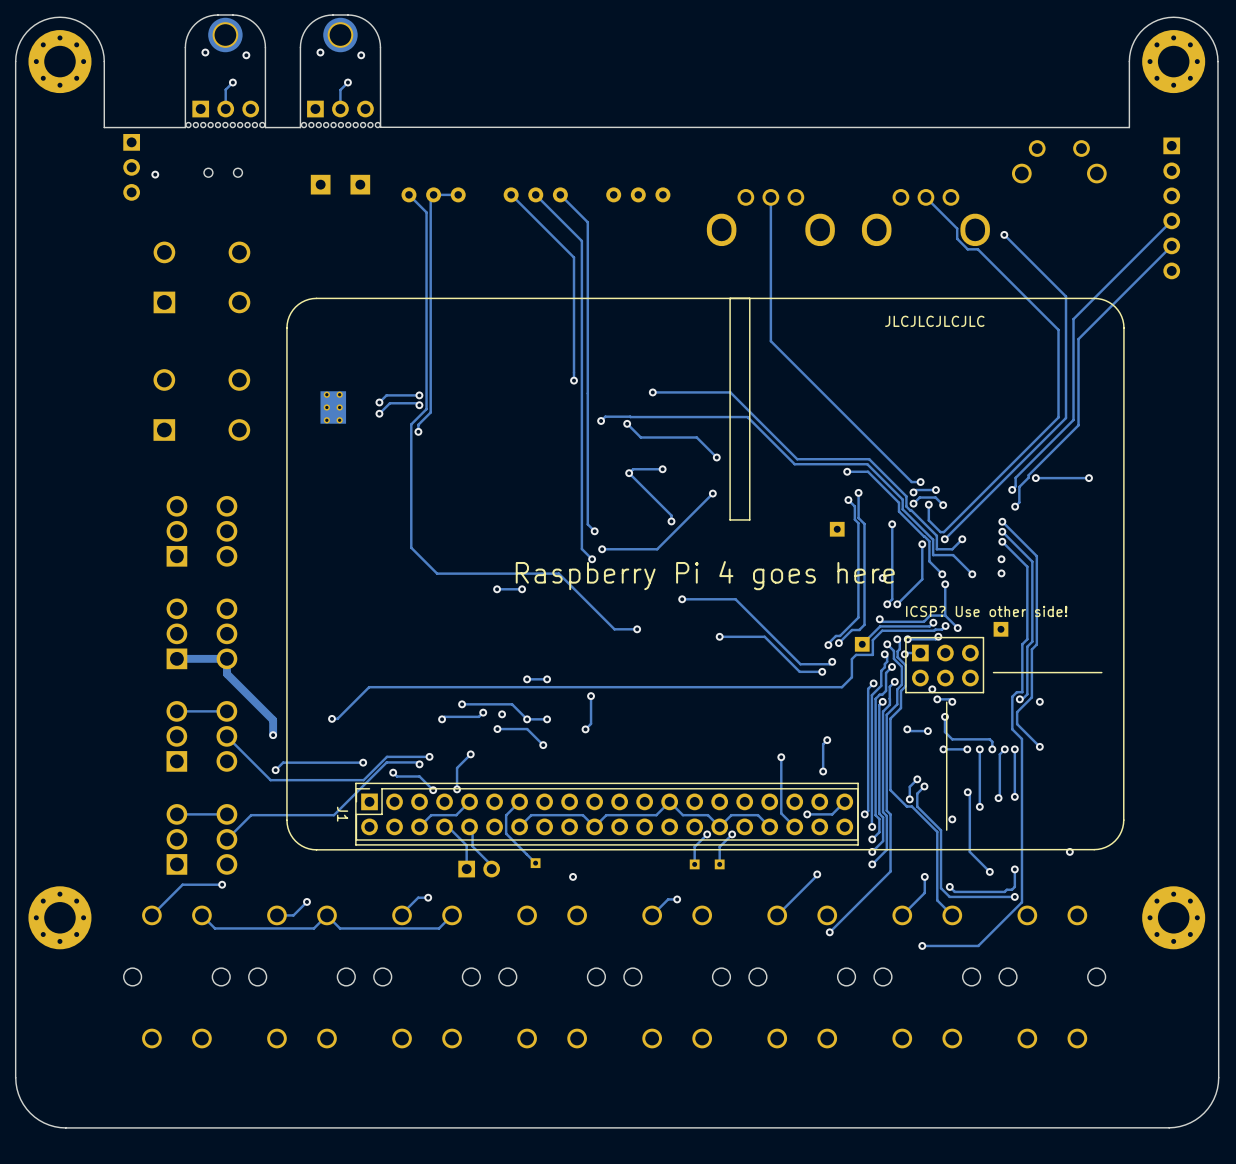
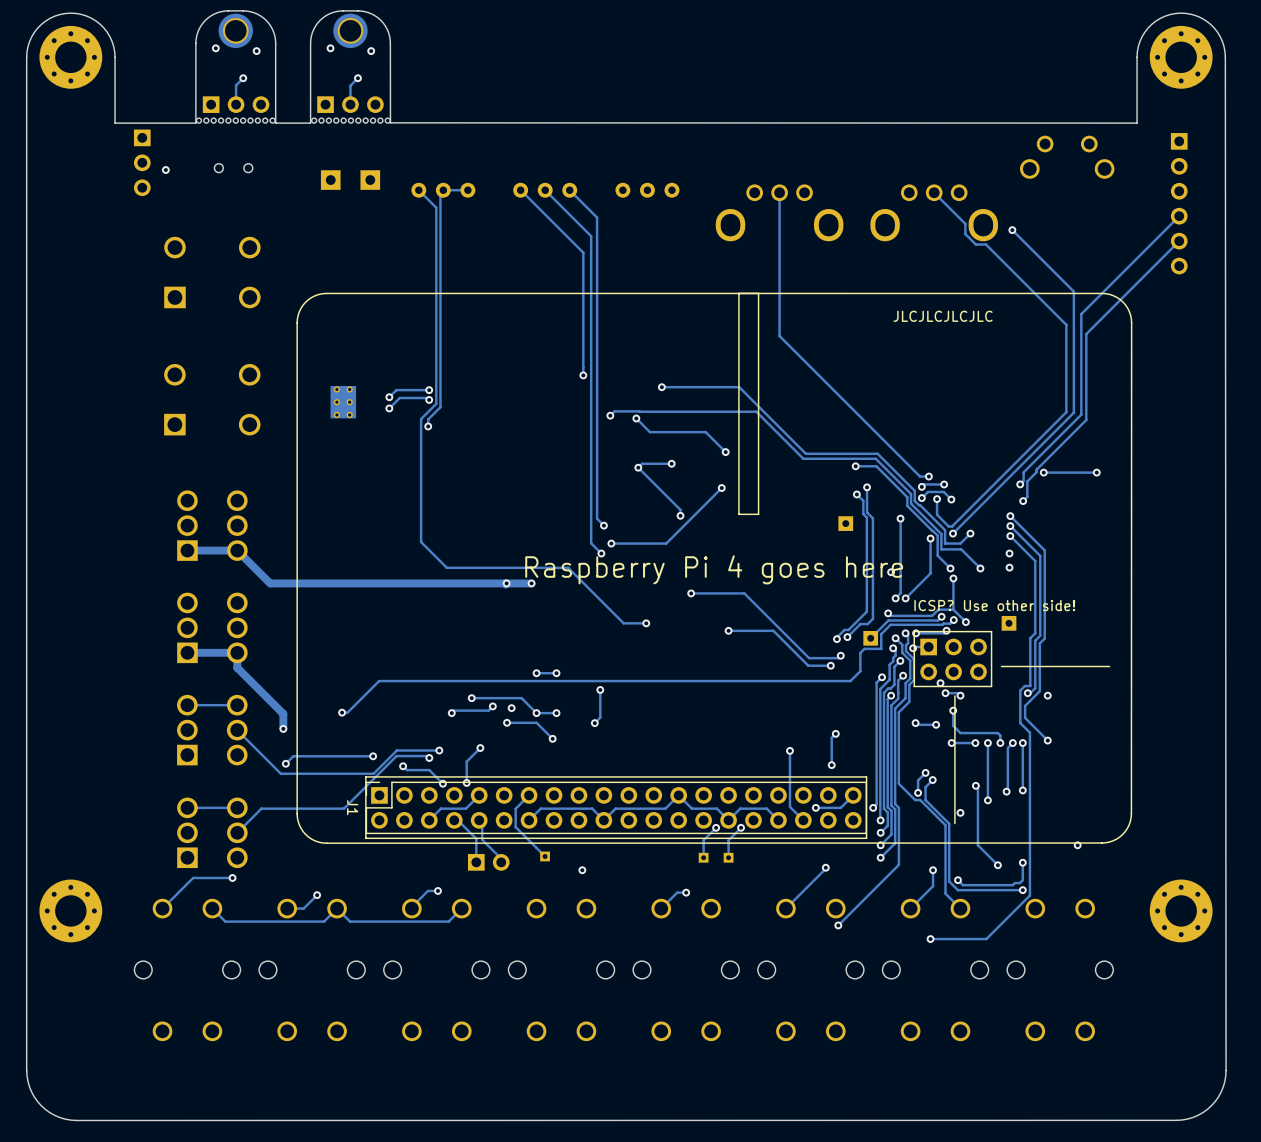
track: none -> (187, 550) (237, 550) (270, 583) (506, 583)
track width: thin (522, 589) (497, 589) -> thick (531, 583) (506, 583)

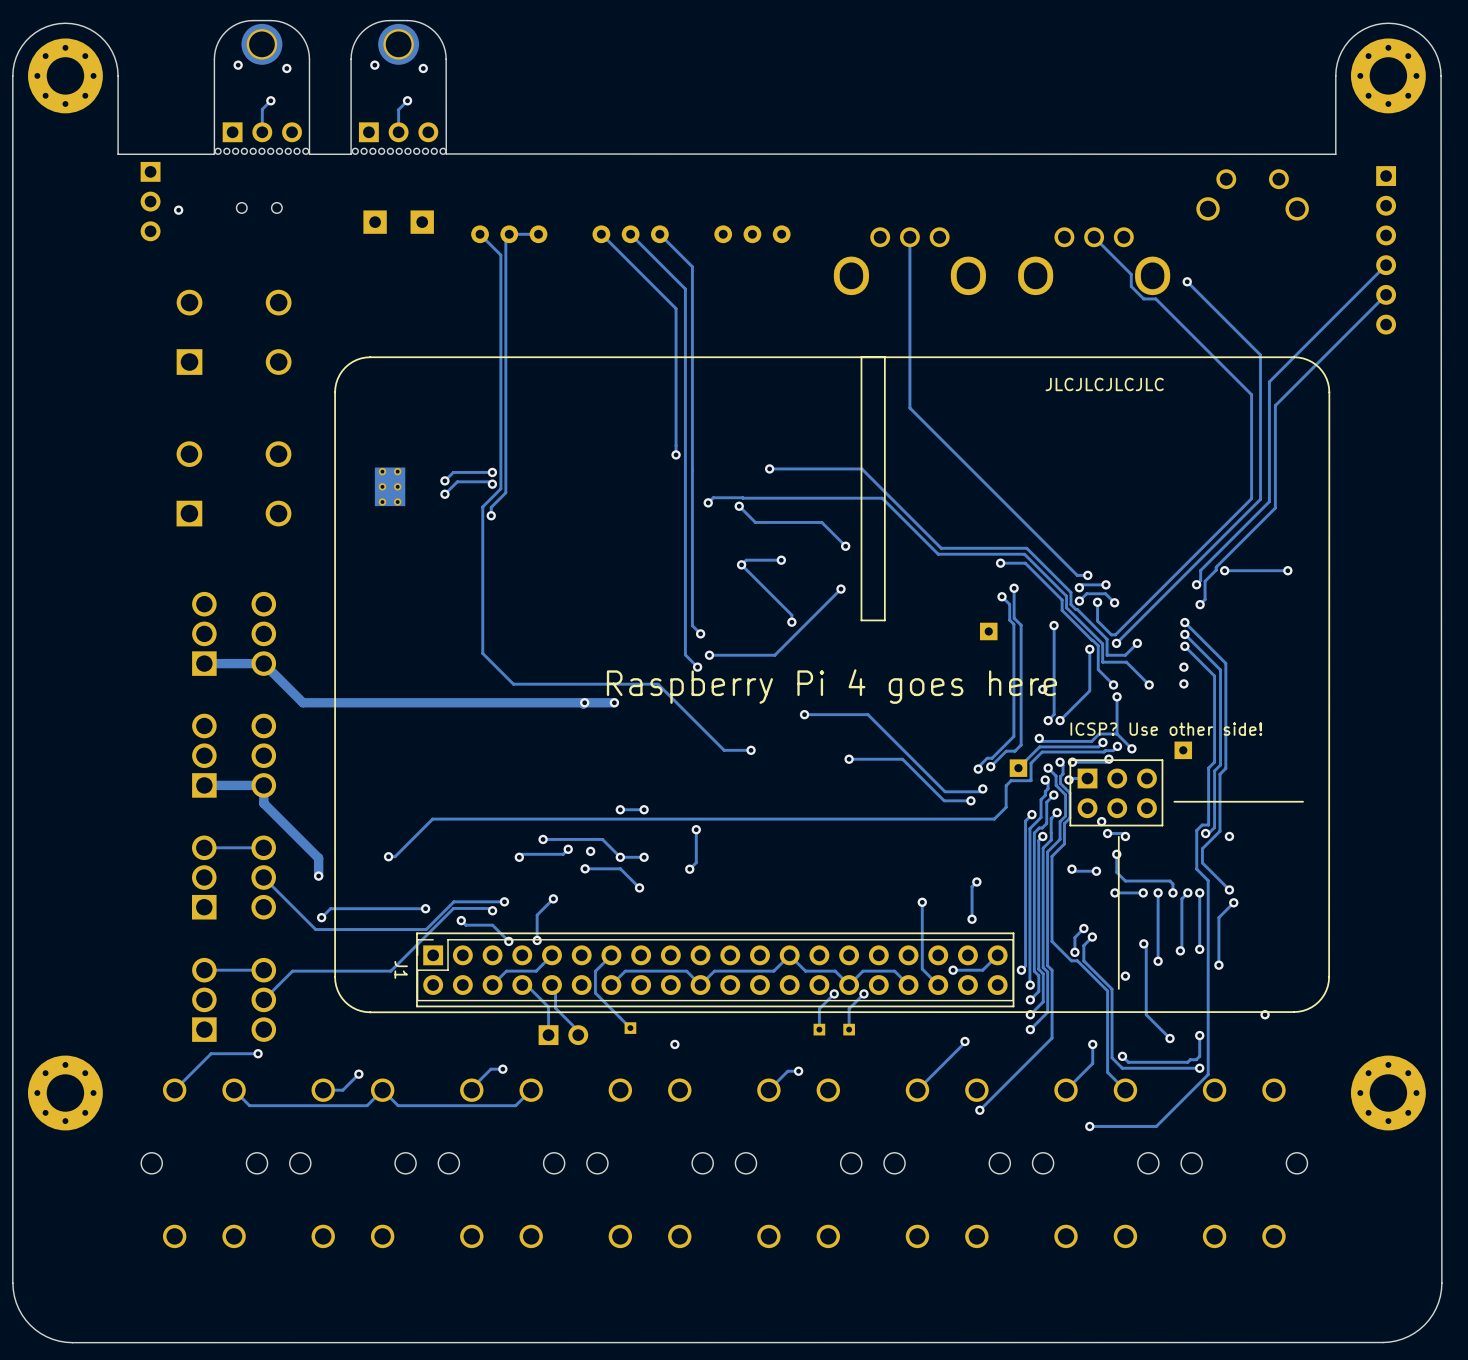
track: none -> (1233, 902) (1218, 917) (1218, 965)
via: none -> (1233, 902)
via: none -> (1218, 965)

